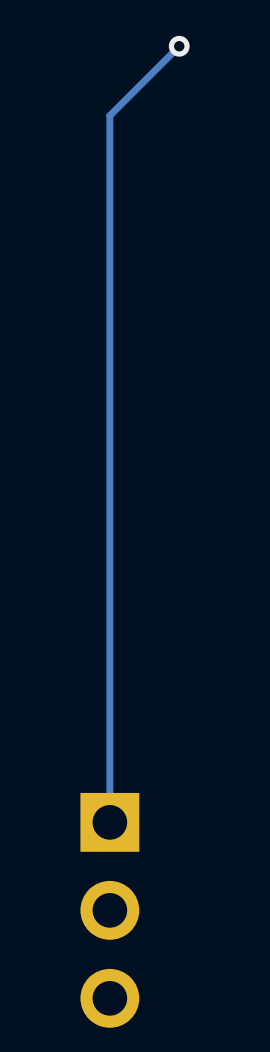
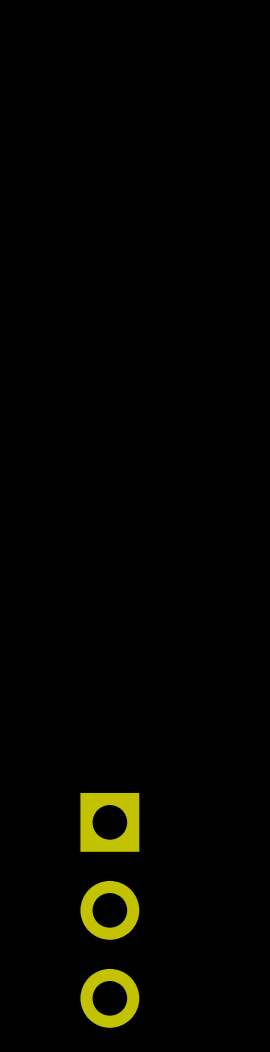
track: (179, 46) (109, 115) (109, 822) -> none
via: (179, 46) -> none

